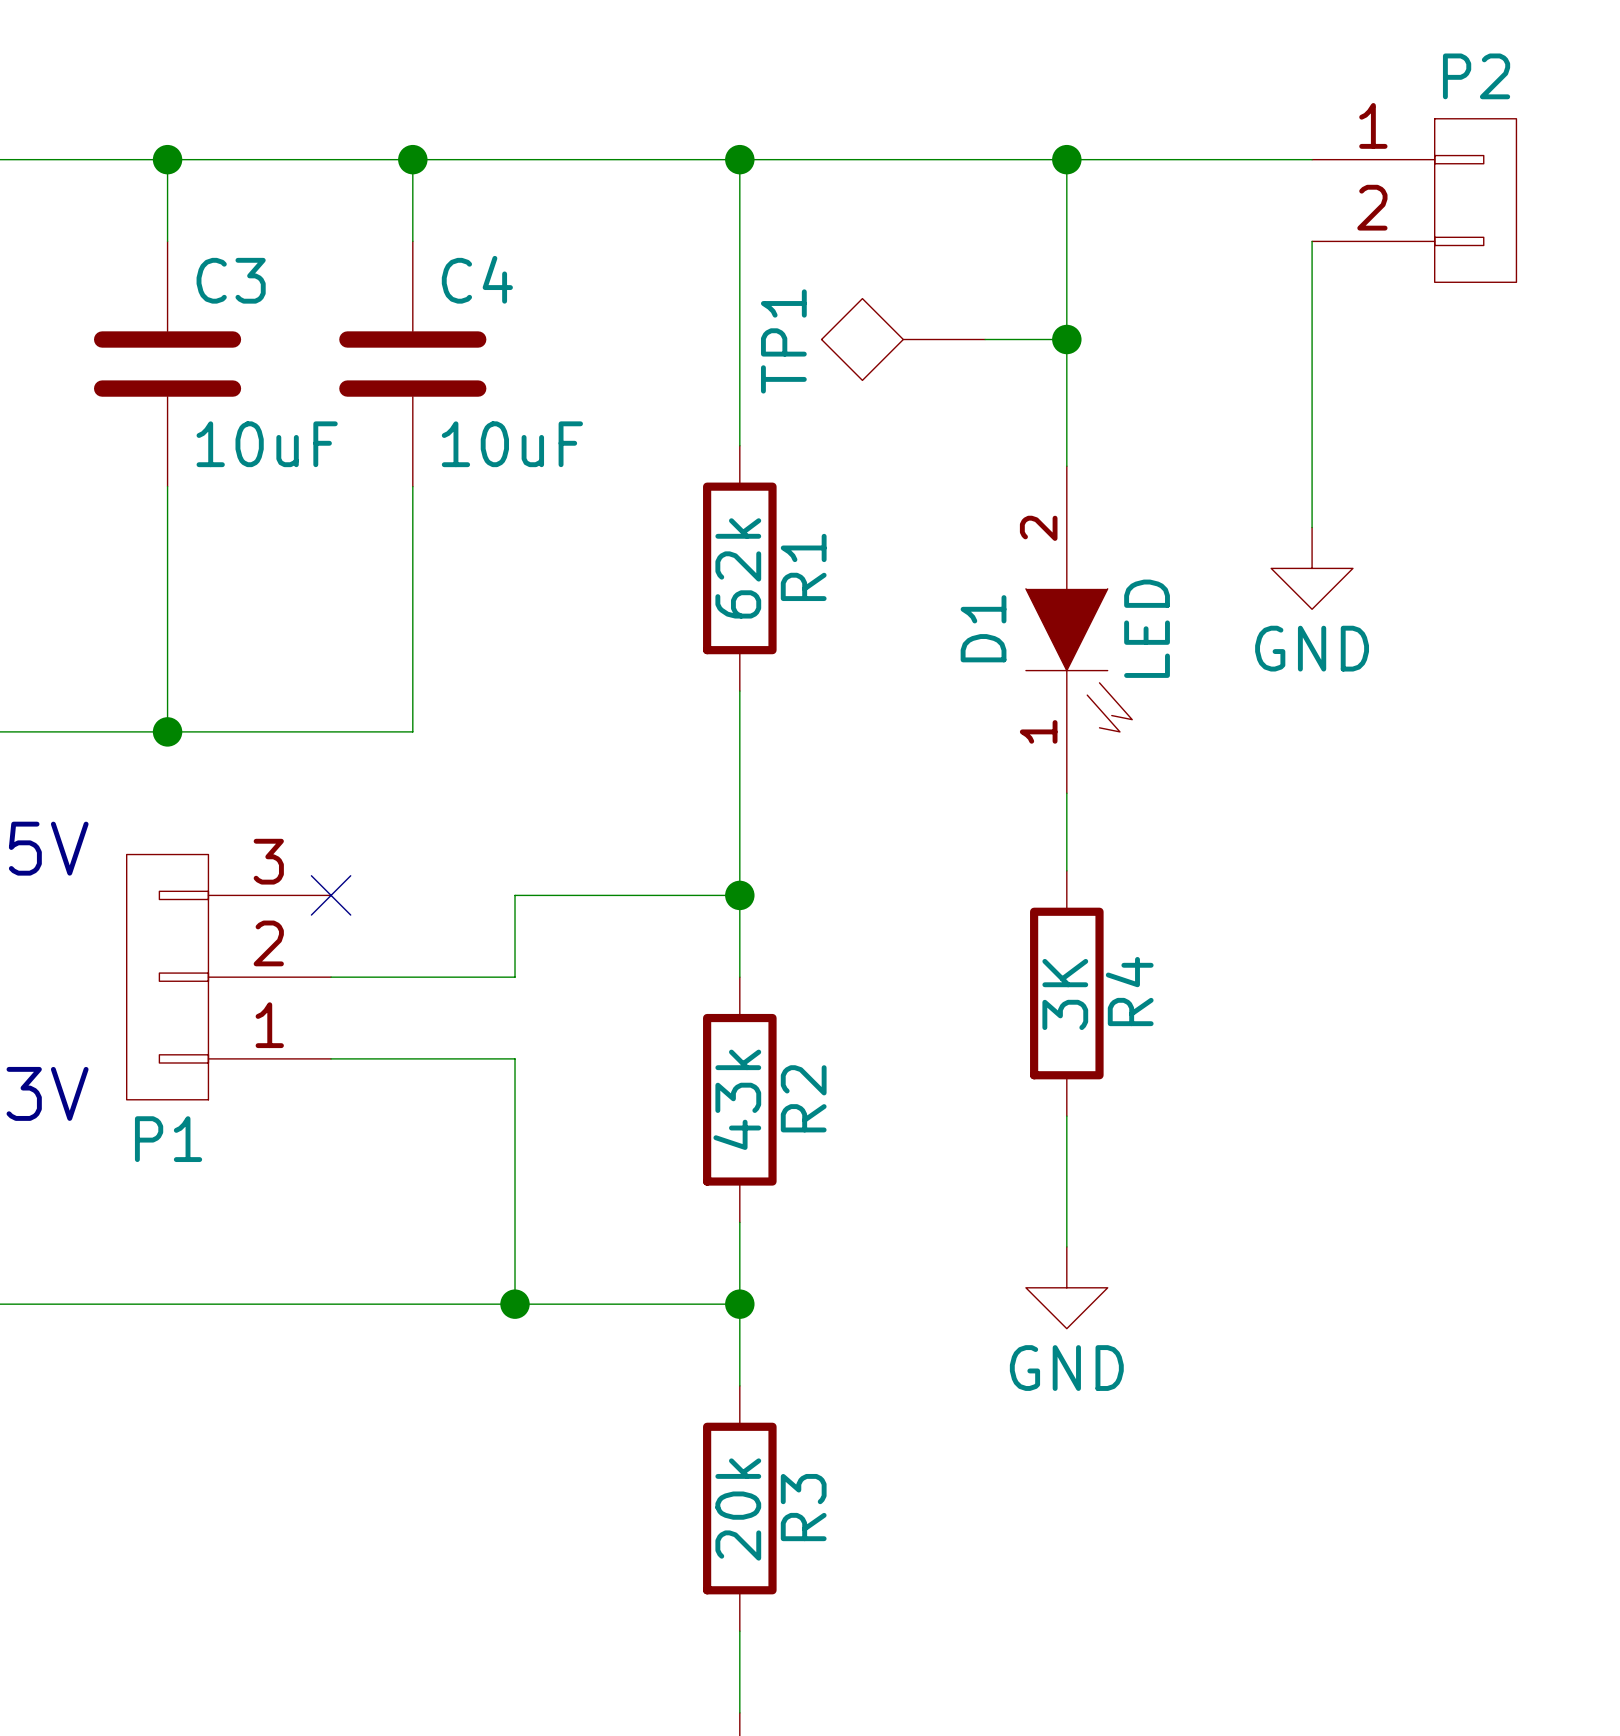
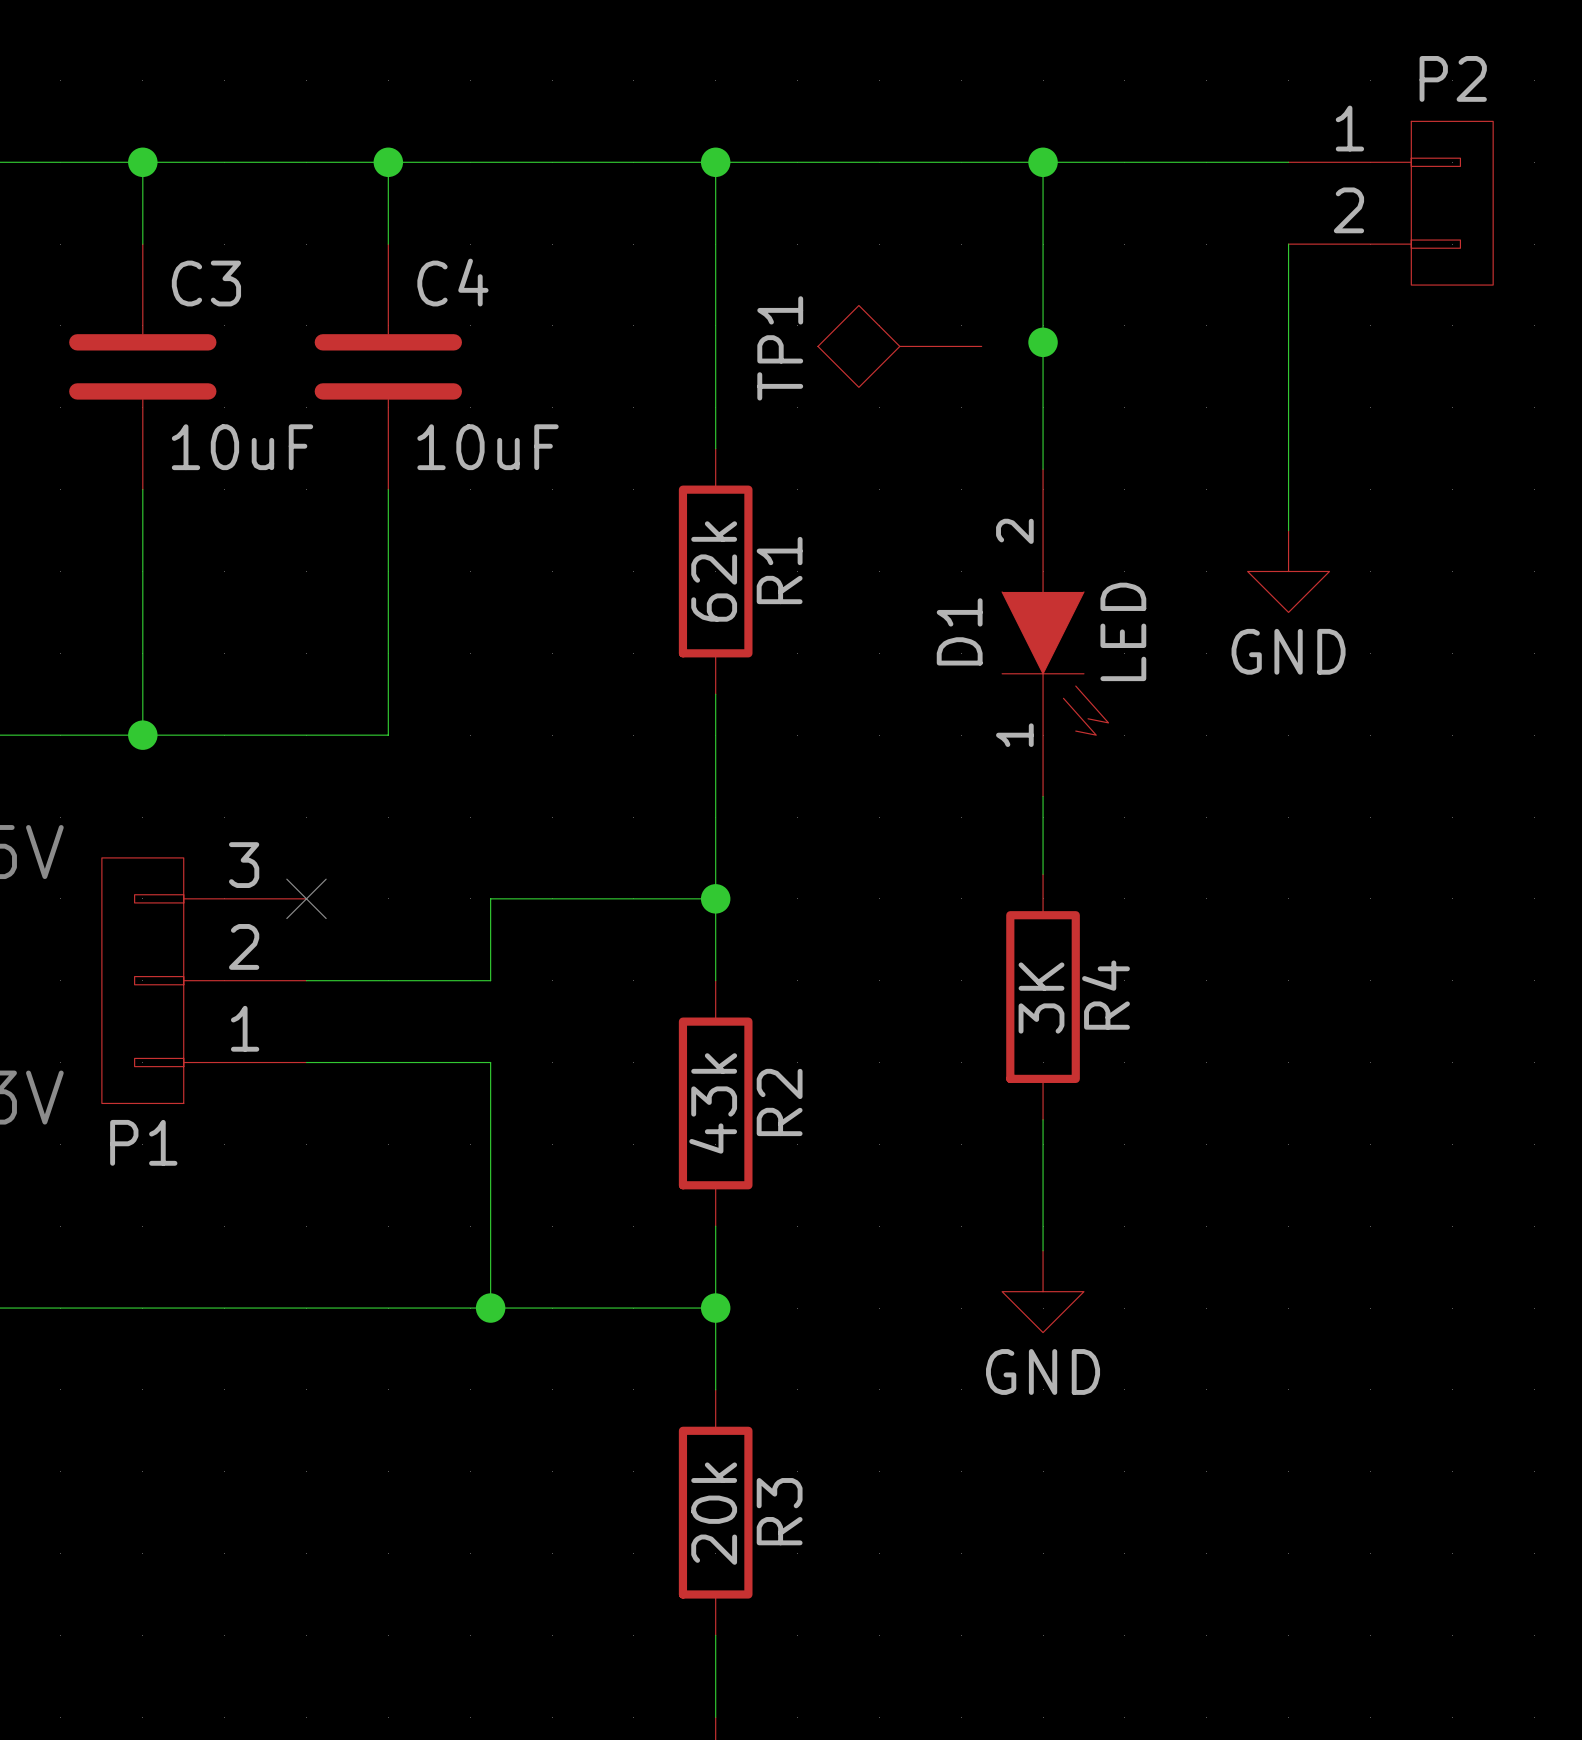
TP1 position: (903, 339) -> (899, 346)
wire: (985, 339) (1066, 339) -> none

